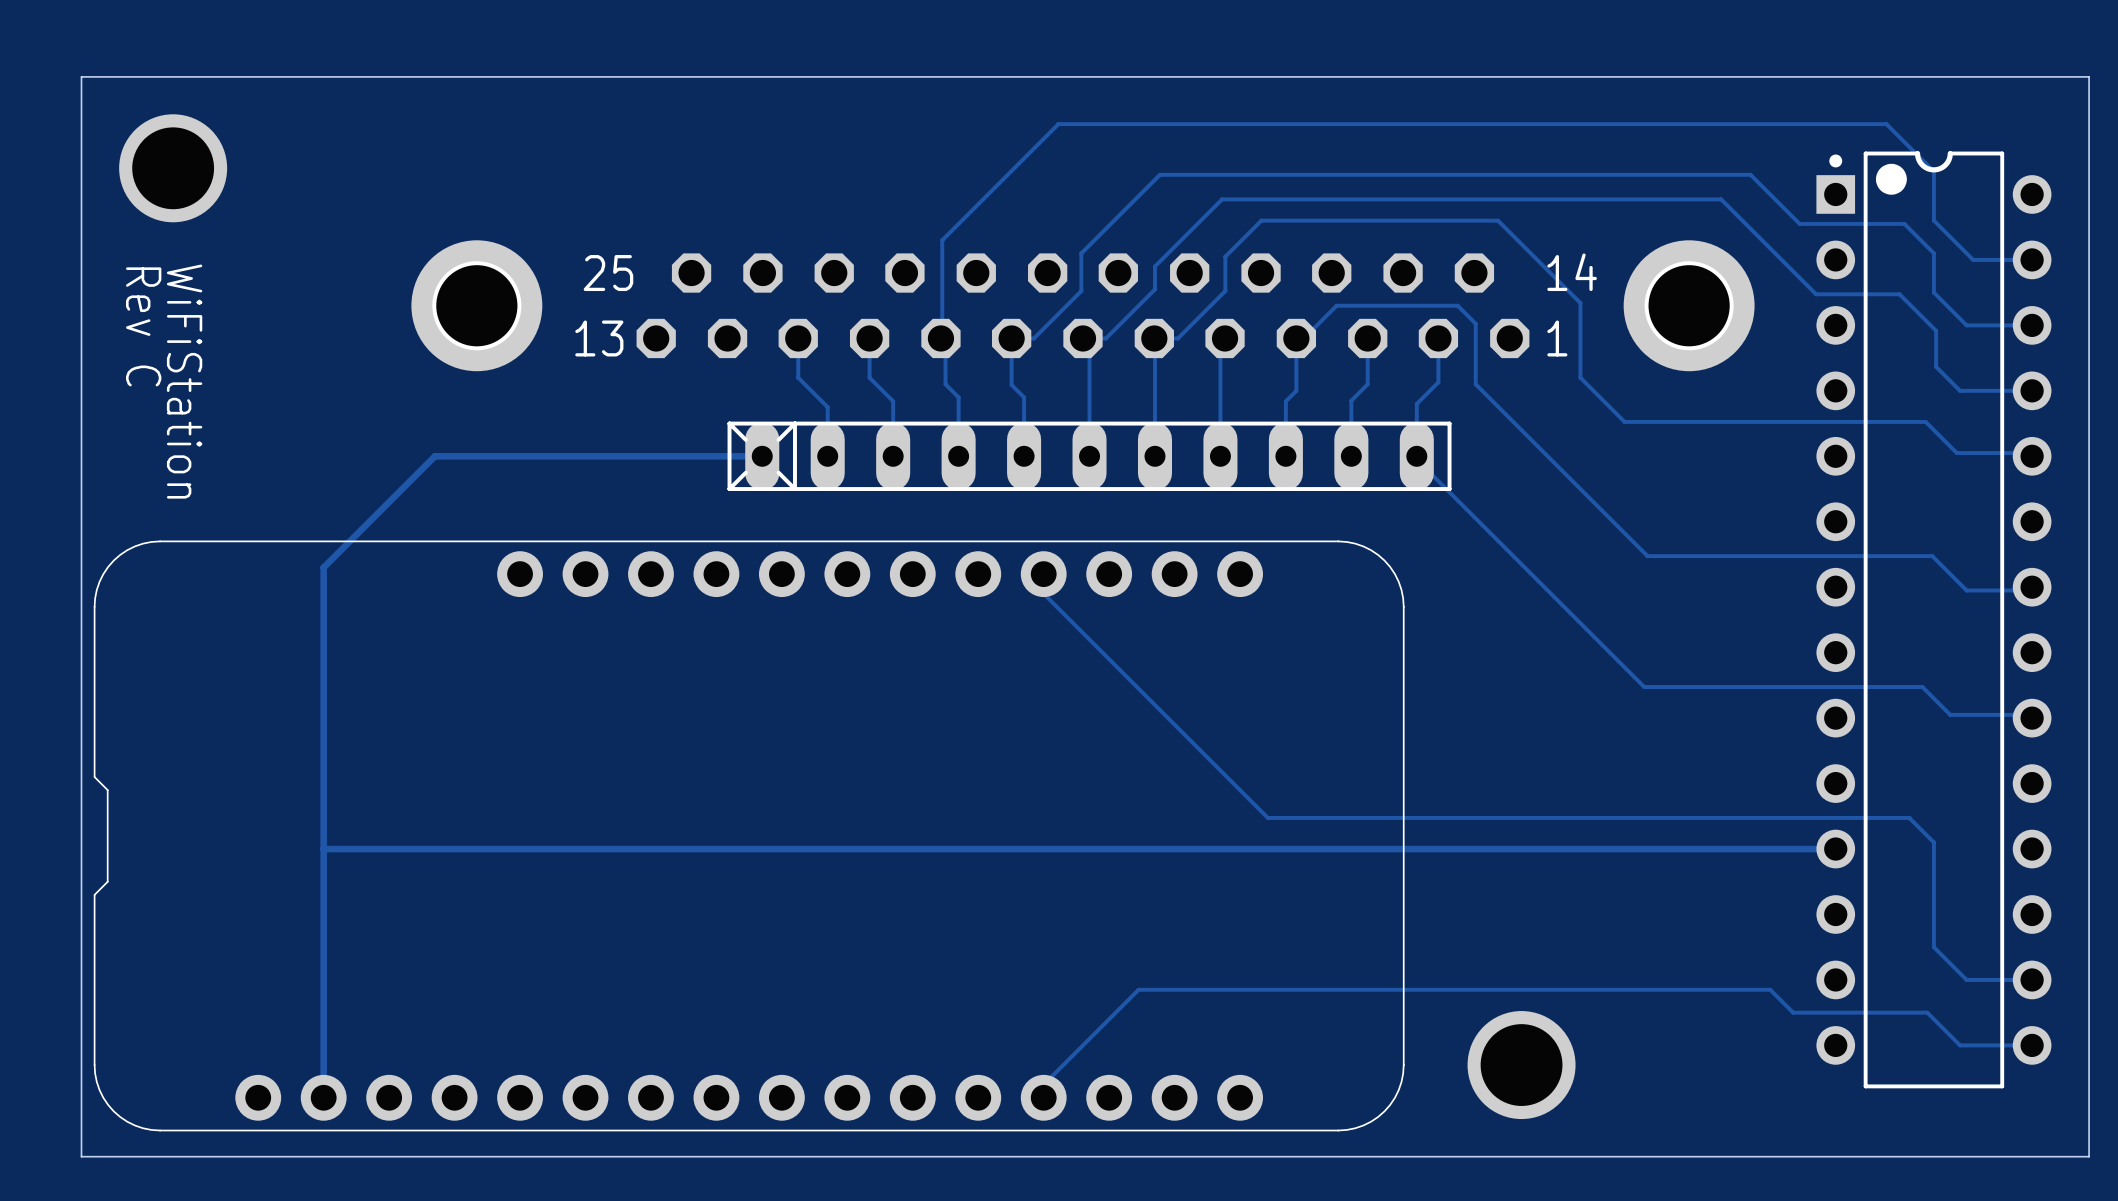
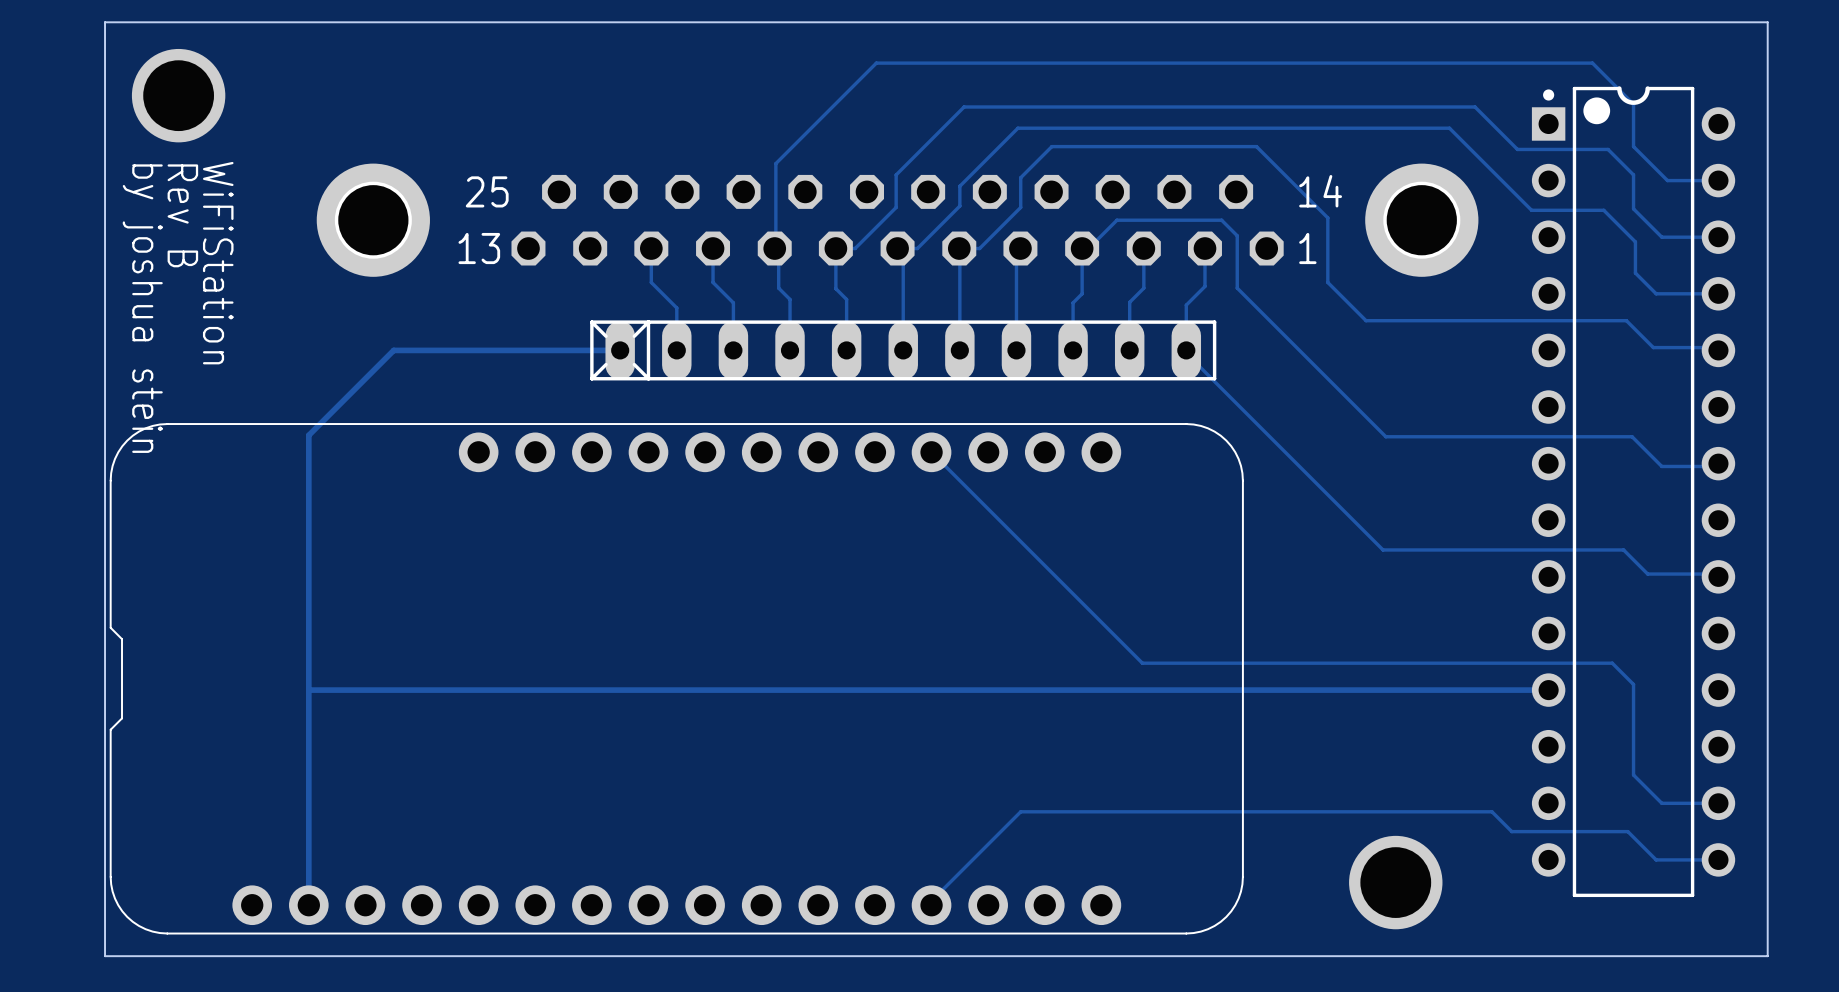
board edge: (166, 76) (81, 76) (81, 1156) (166, 1156) -> (105, 22) (105, 956)
part position: (173, 168) -> (178, 95)
text: none -> Rev B (182, 215)
text: Rev C (143, 326) -> none
text position: WiFiStation (184, 381) -> WiFiStation (218, 263)
text: none -> by joshua stein (142, 308)
track: (500, 456) (434, 456) (323, 567) (323, 1097) -> (393, 350) (308, 435) (308, 905)
track: (1043, 574) (1043, 593) (1267, 817) (1366, 817) -> (931, 452) (1142, 663)
part position: (749, 835) -> (676, 678)
track: (323, 849) (402, 849) -> none
track: (1225, 989) (1138, 989) (1043, 1084) (1043, 1097) -> (1020, 811) (932, 899) (931, 905)
part position: (1521, 1065) -> (1395, 882)

